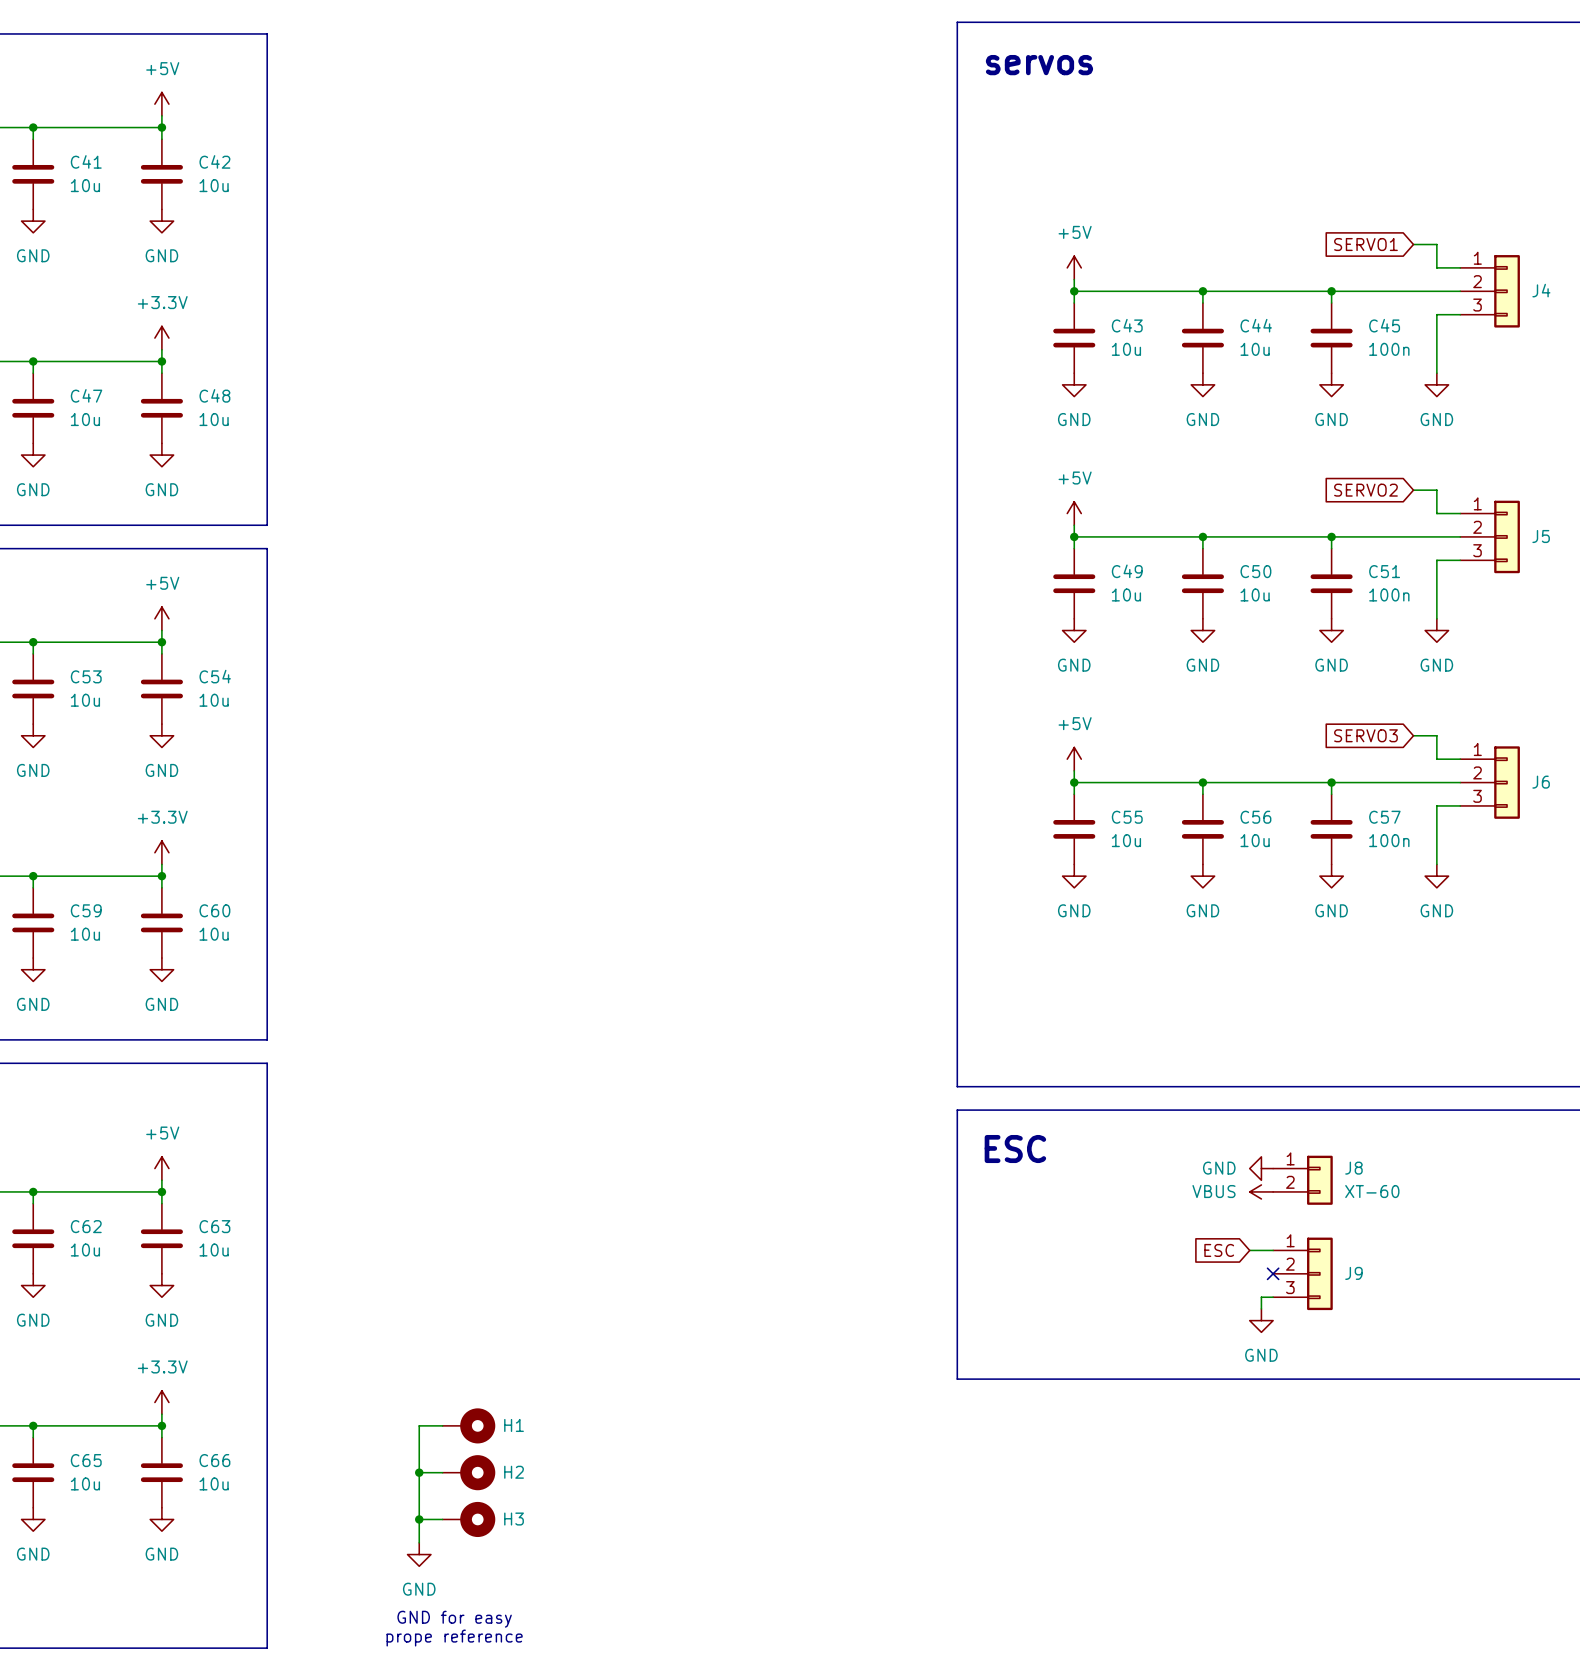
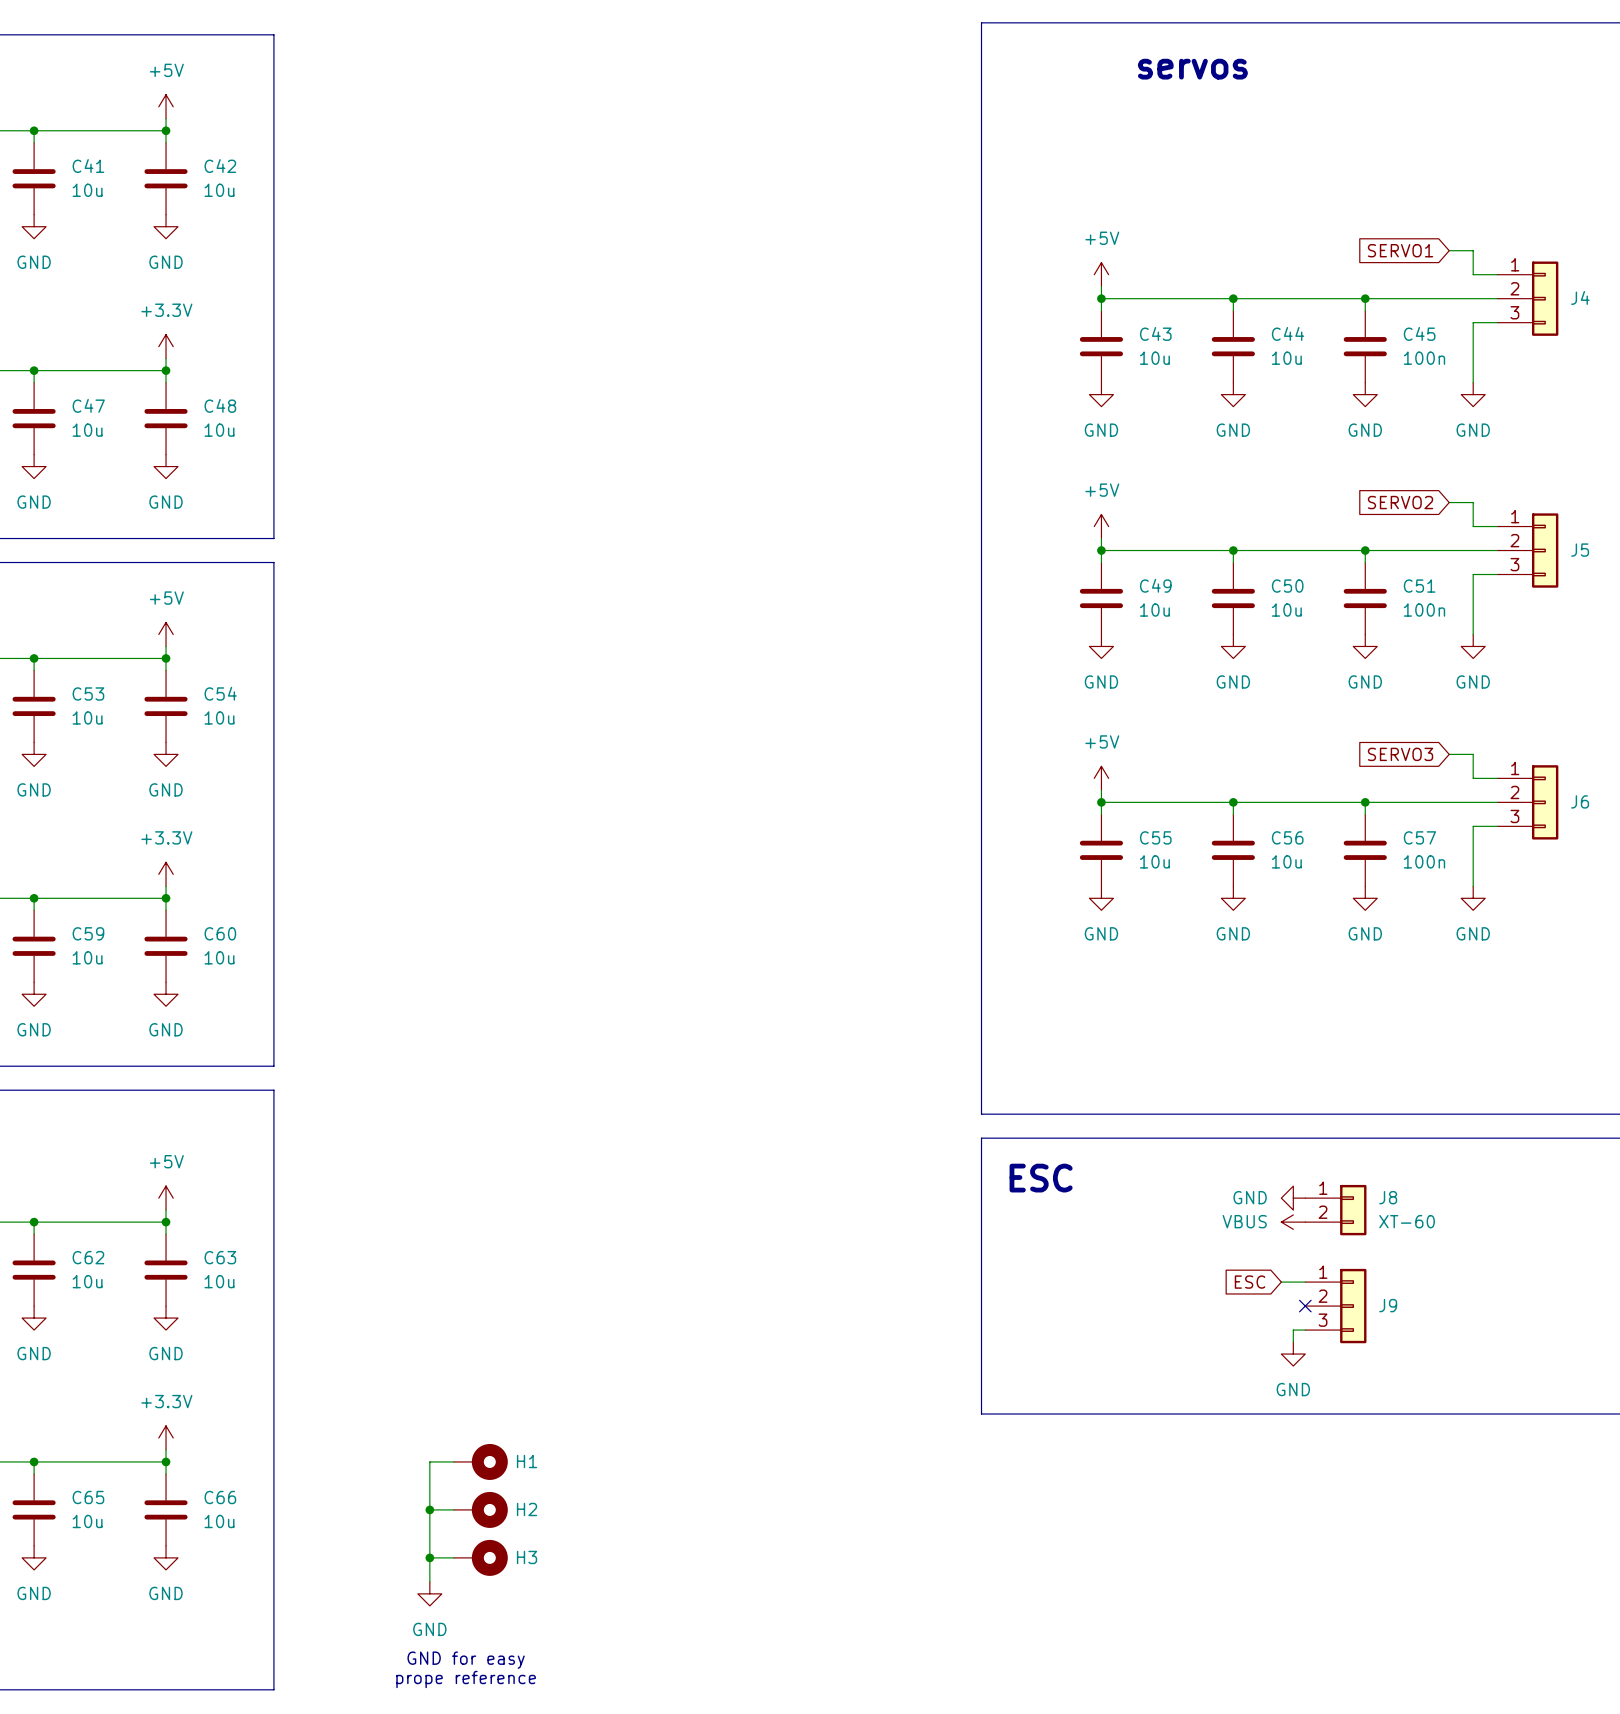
text position: servos (1039, 65) -> servos (1192, 69)

